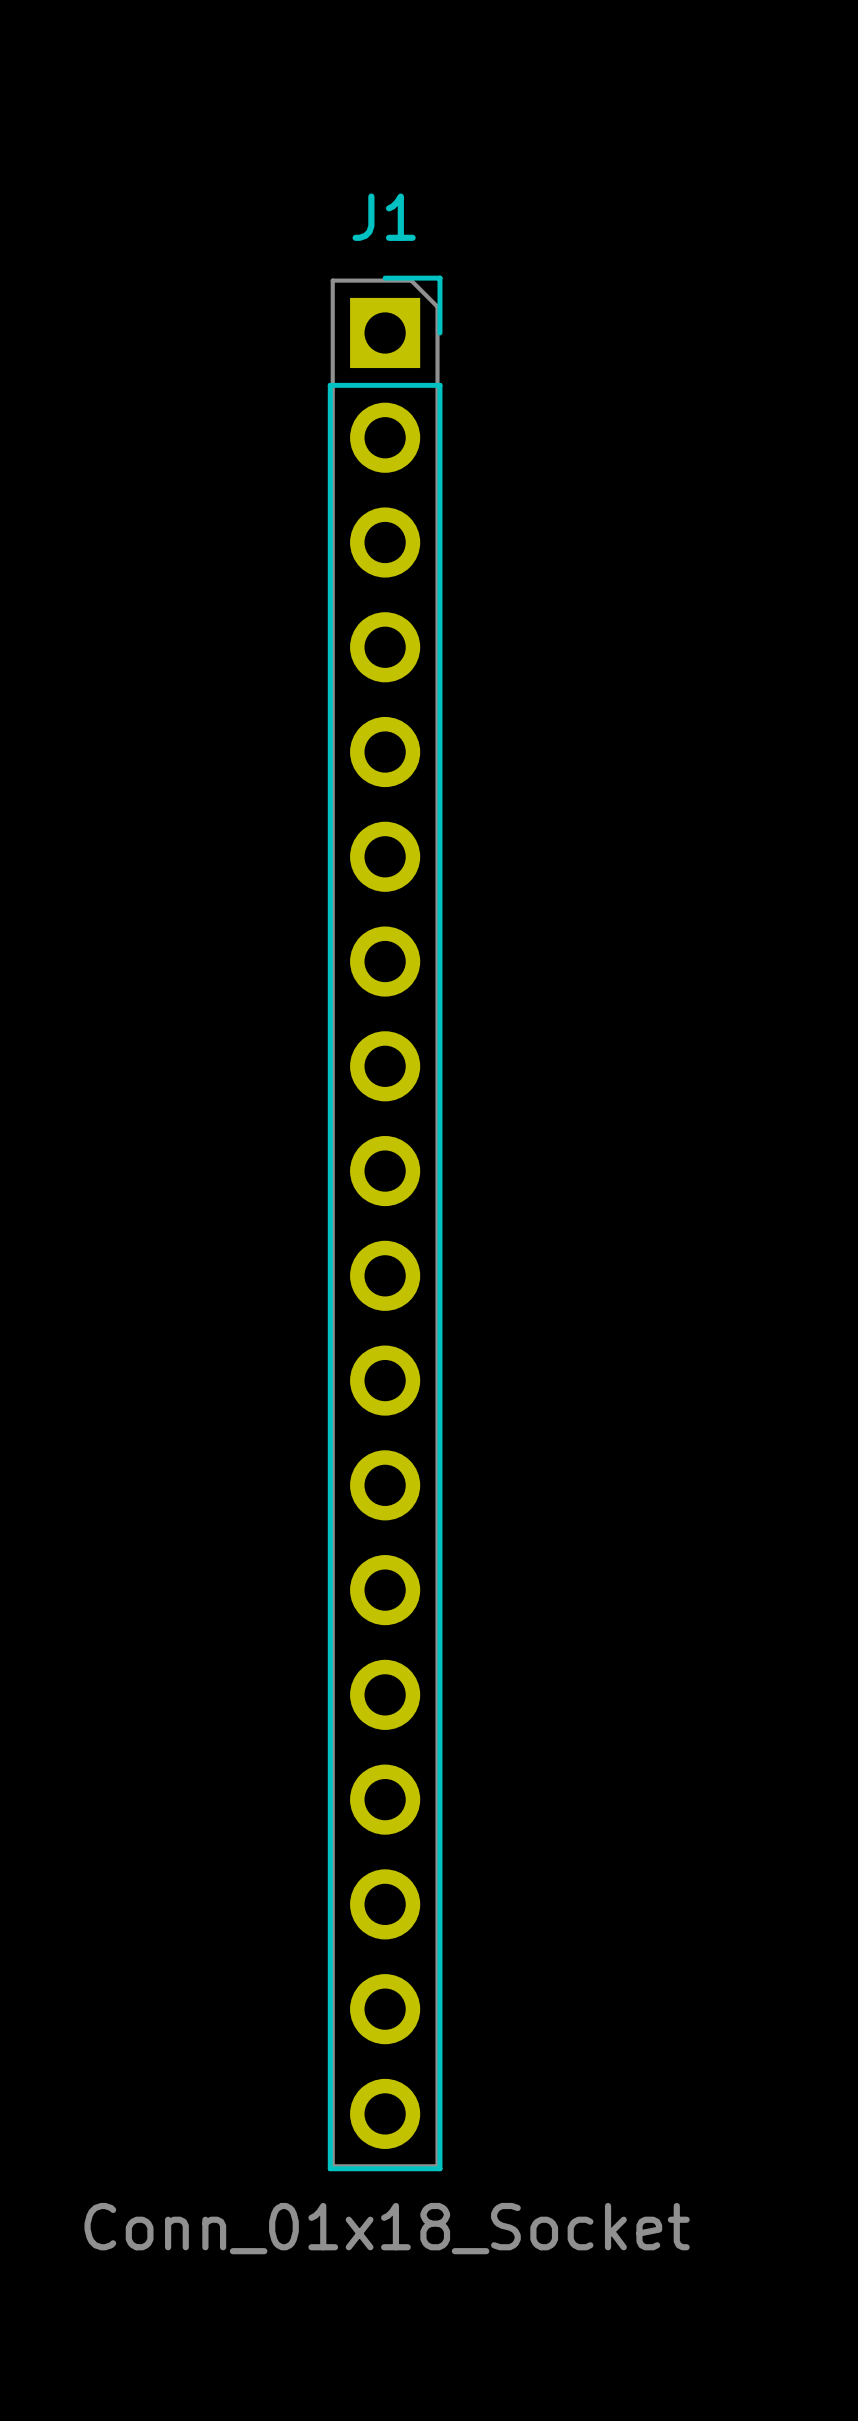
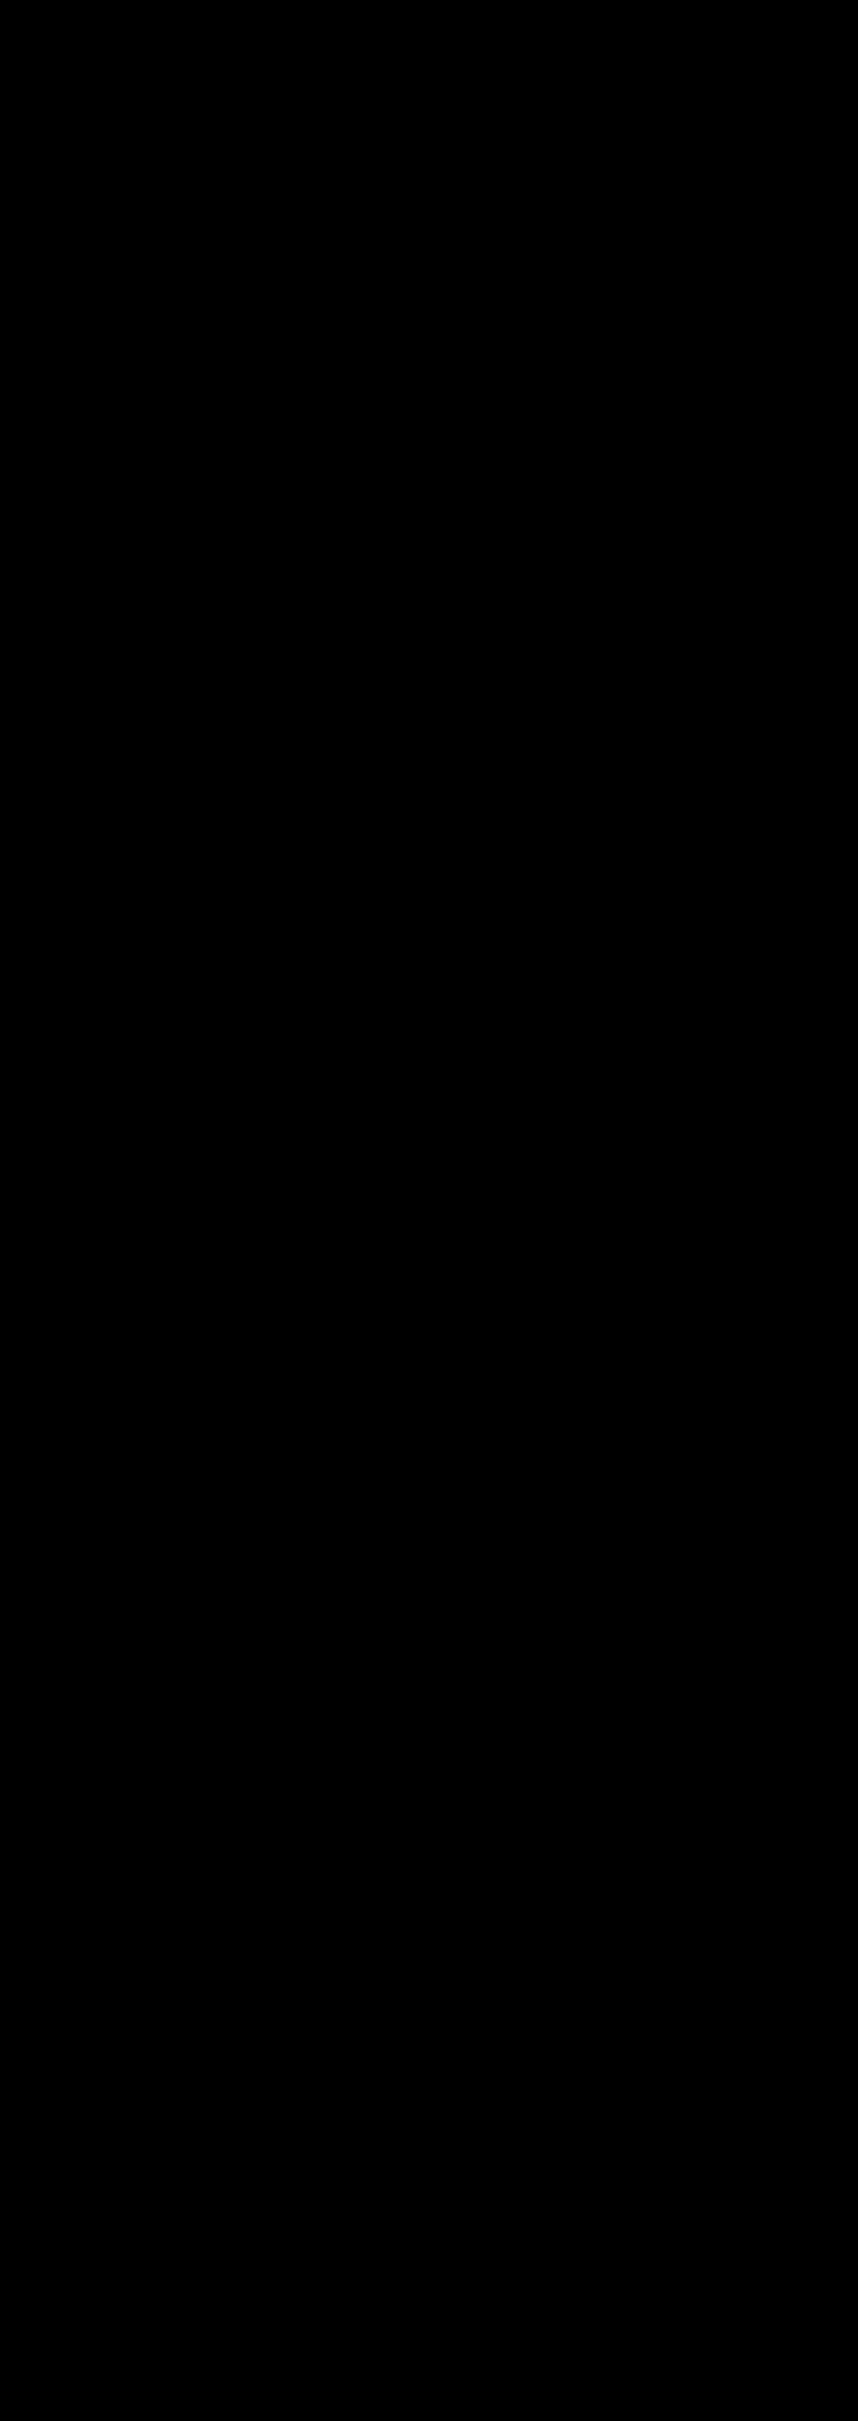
J1: Conn_01x18_Socket (385, 1223) -> none

